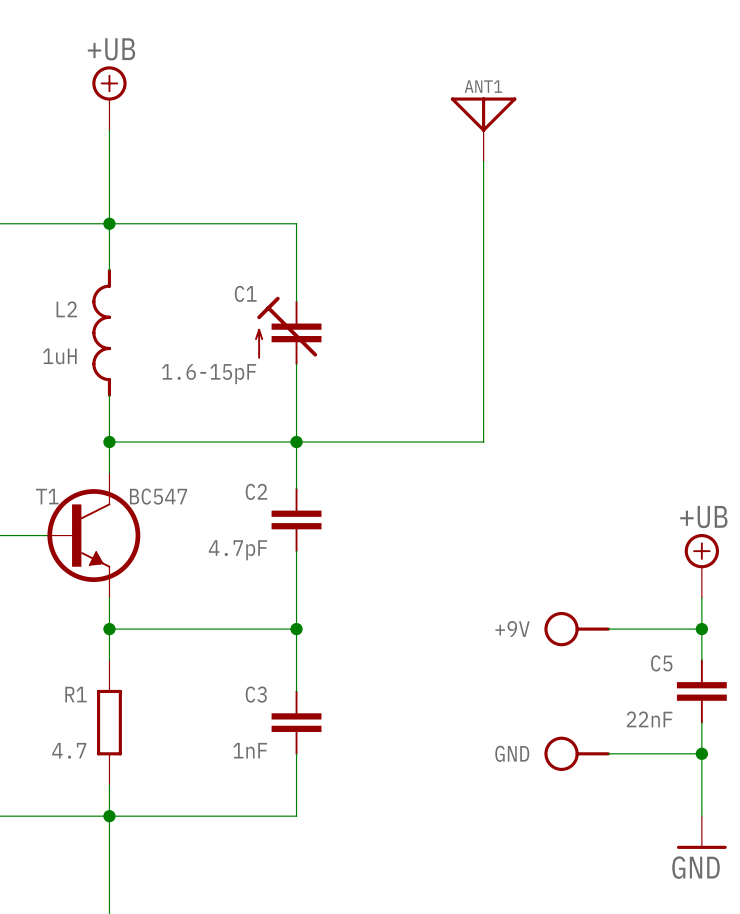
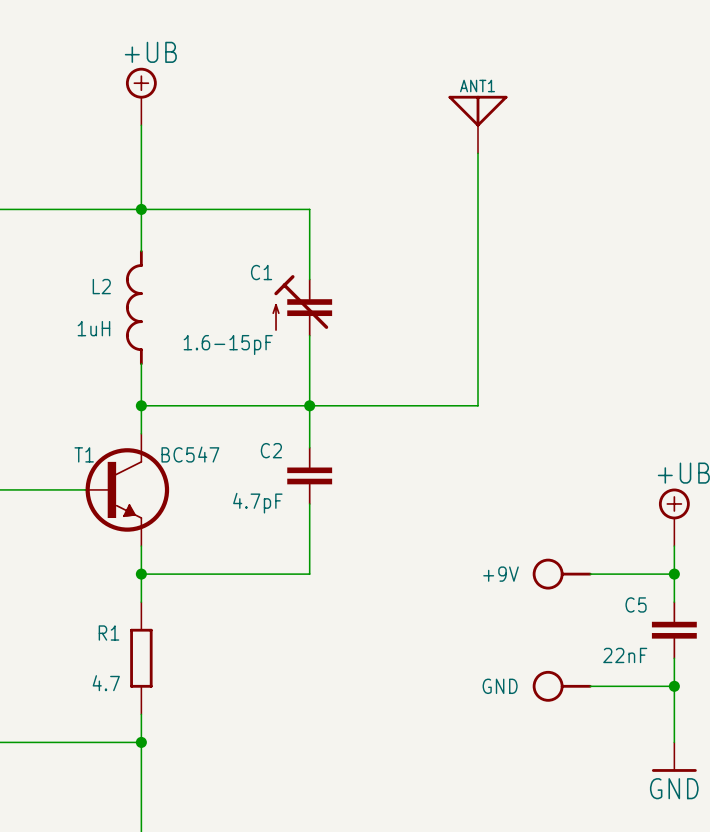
wire: (296, 629) (296, 691) -> none
junction: (296, 629) -> none
C3: 1nF (296, 722) -> none
wire: (296, 753) (296, 816) (109, 816) -> none

